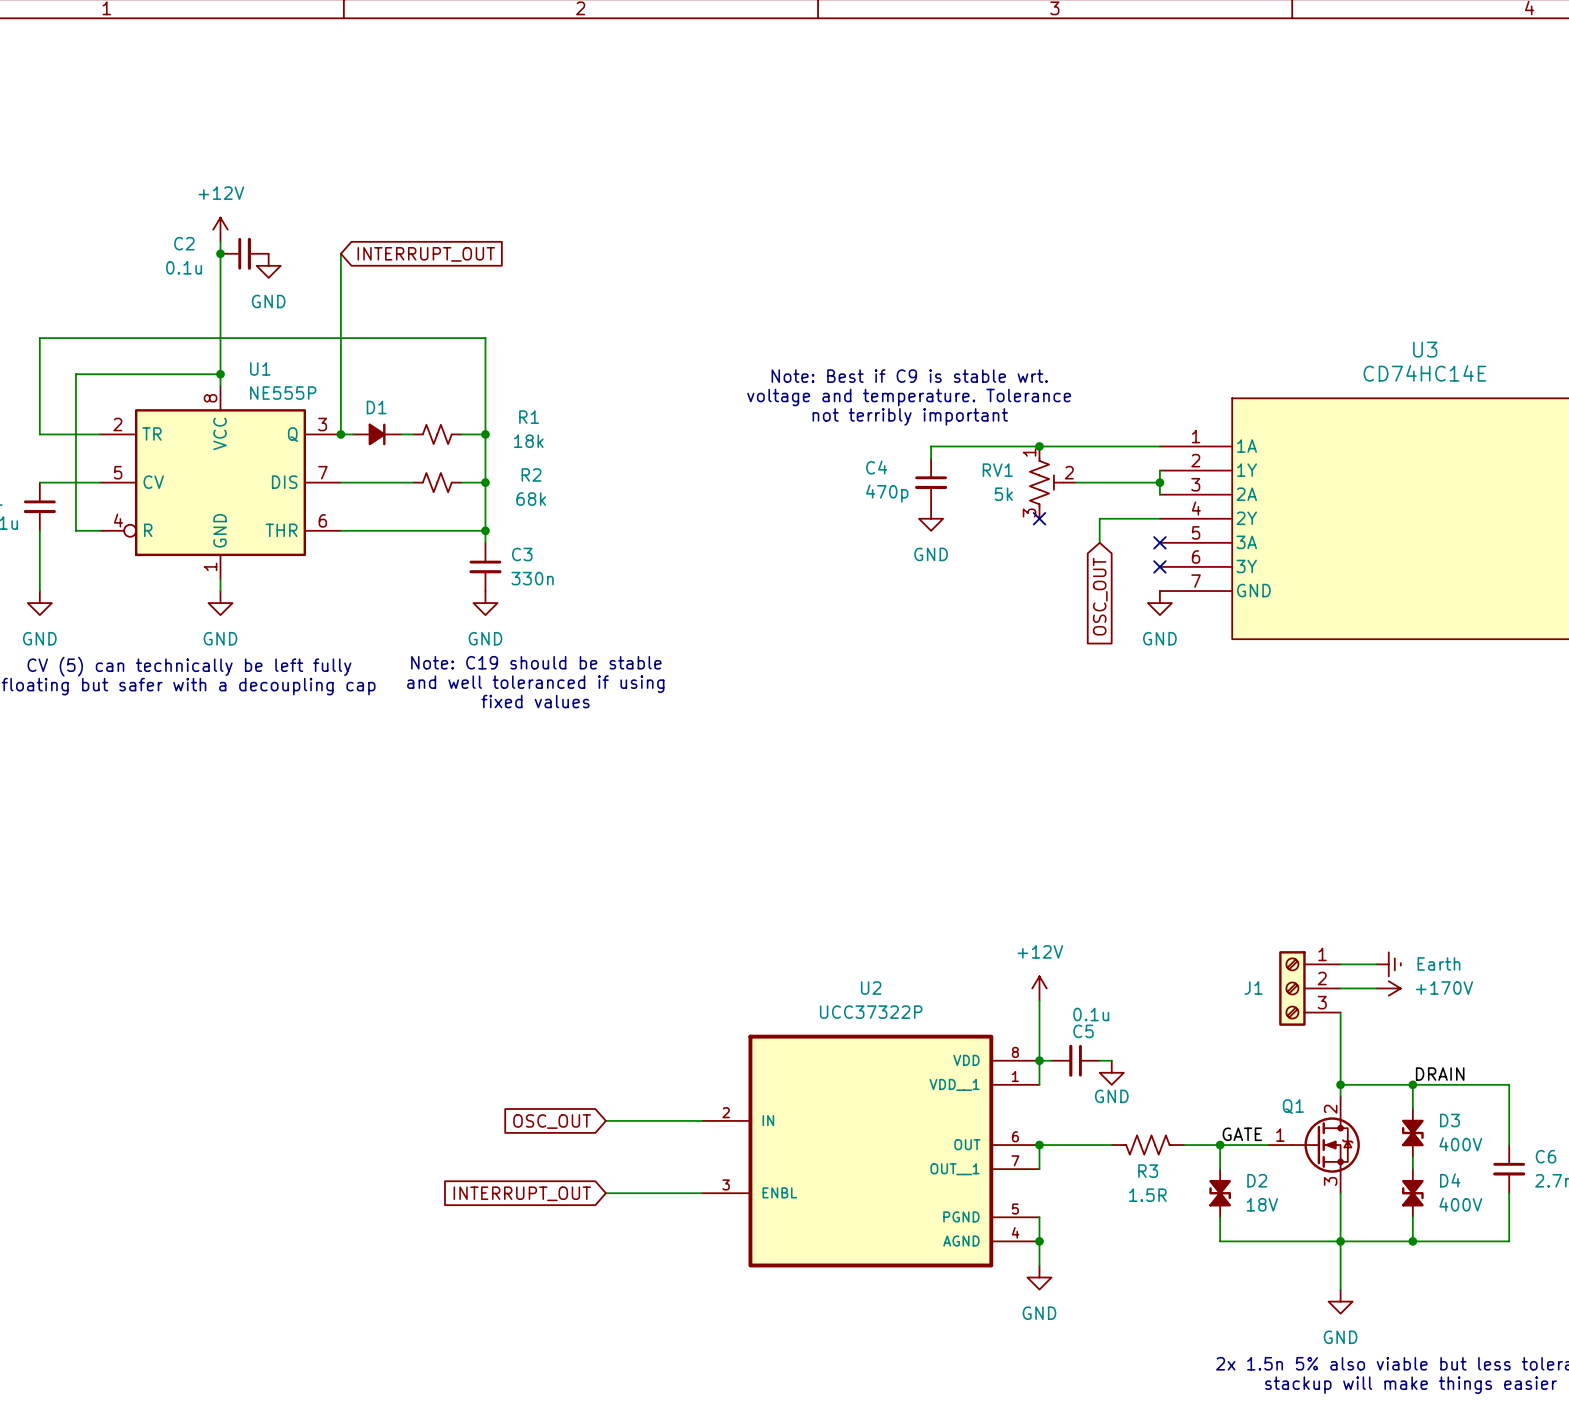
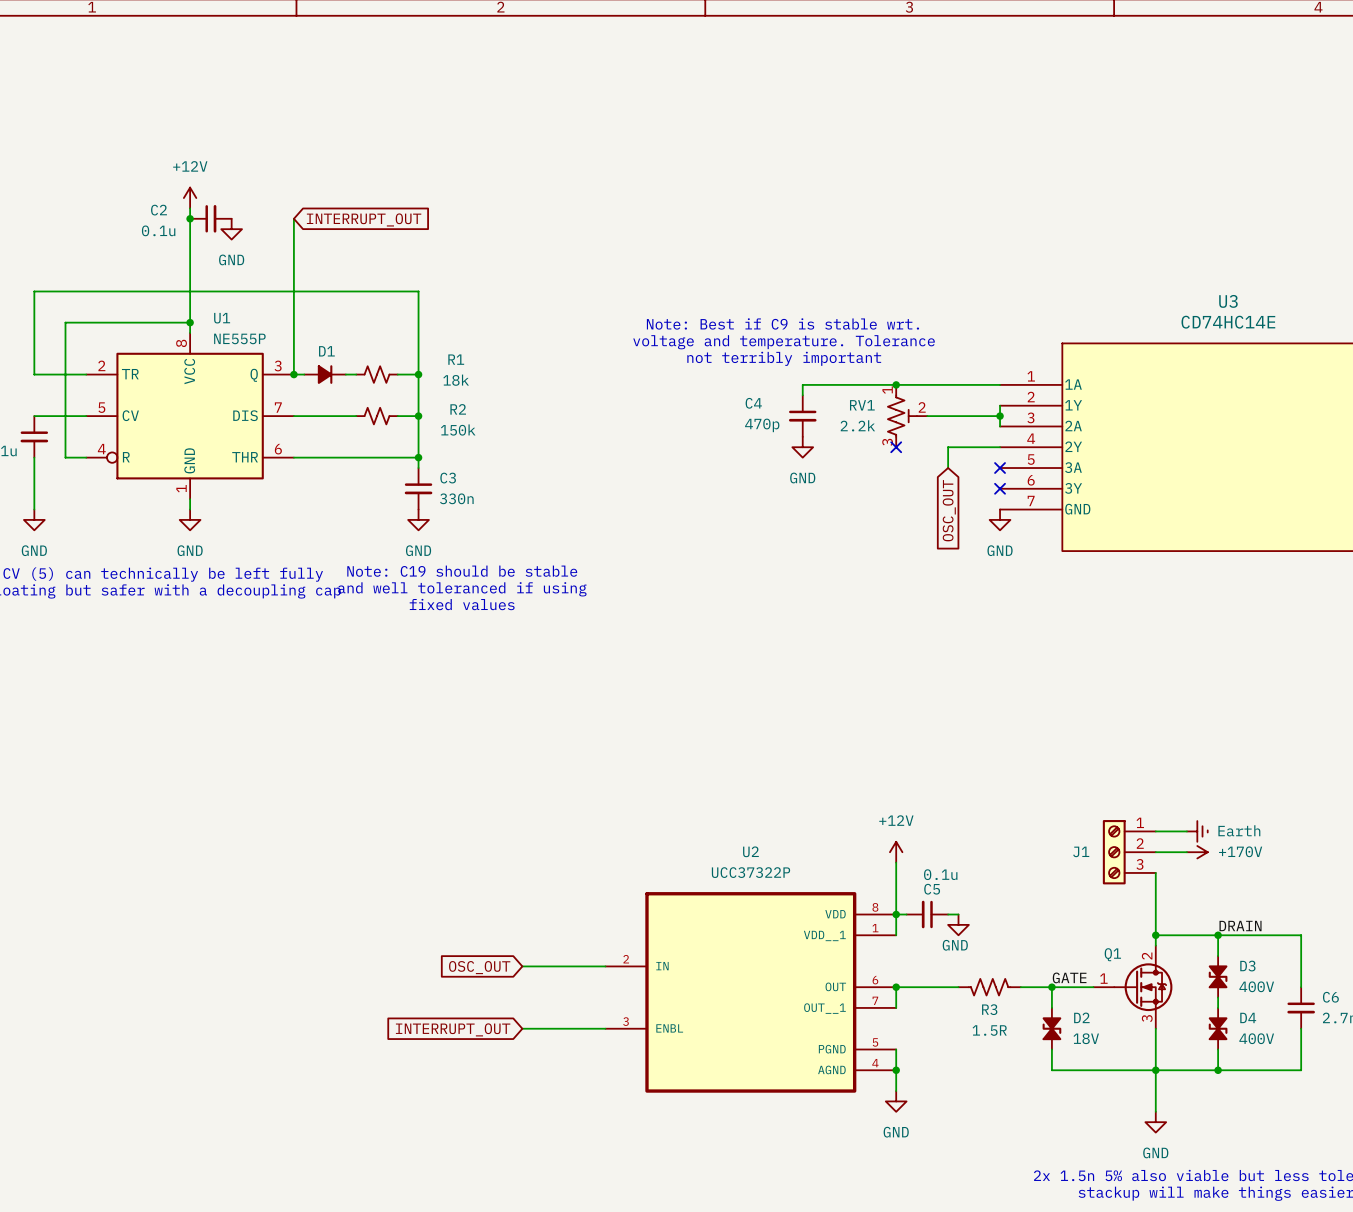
RV1 value: 5k (1003, 494) -> 2.2k (857, 425)
R2 value: 68k (531, 499) -> 150k (458, 430)

